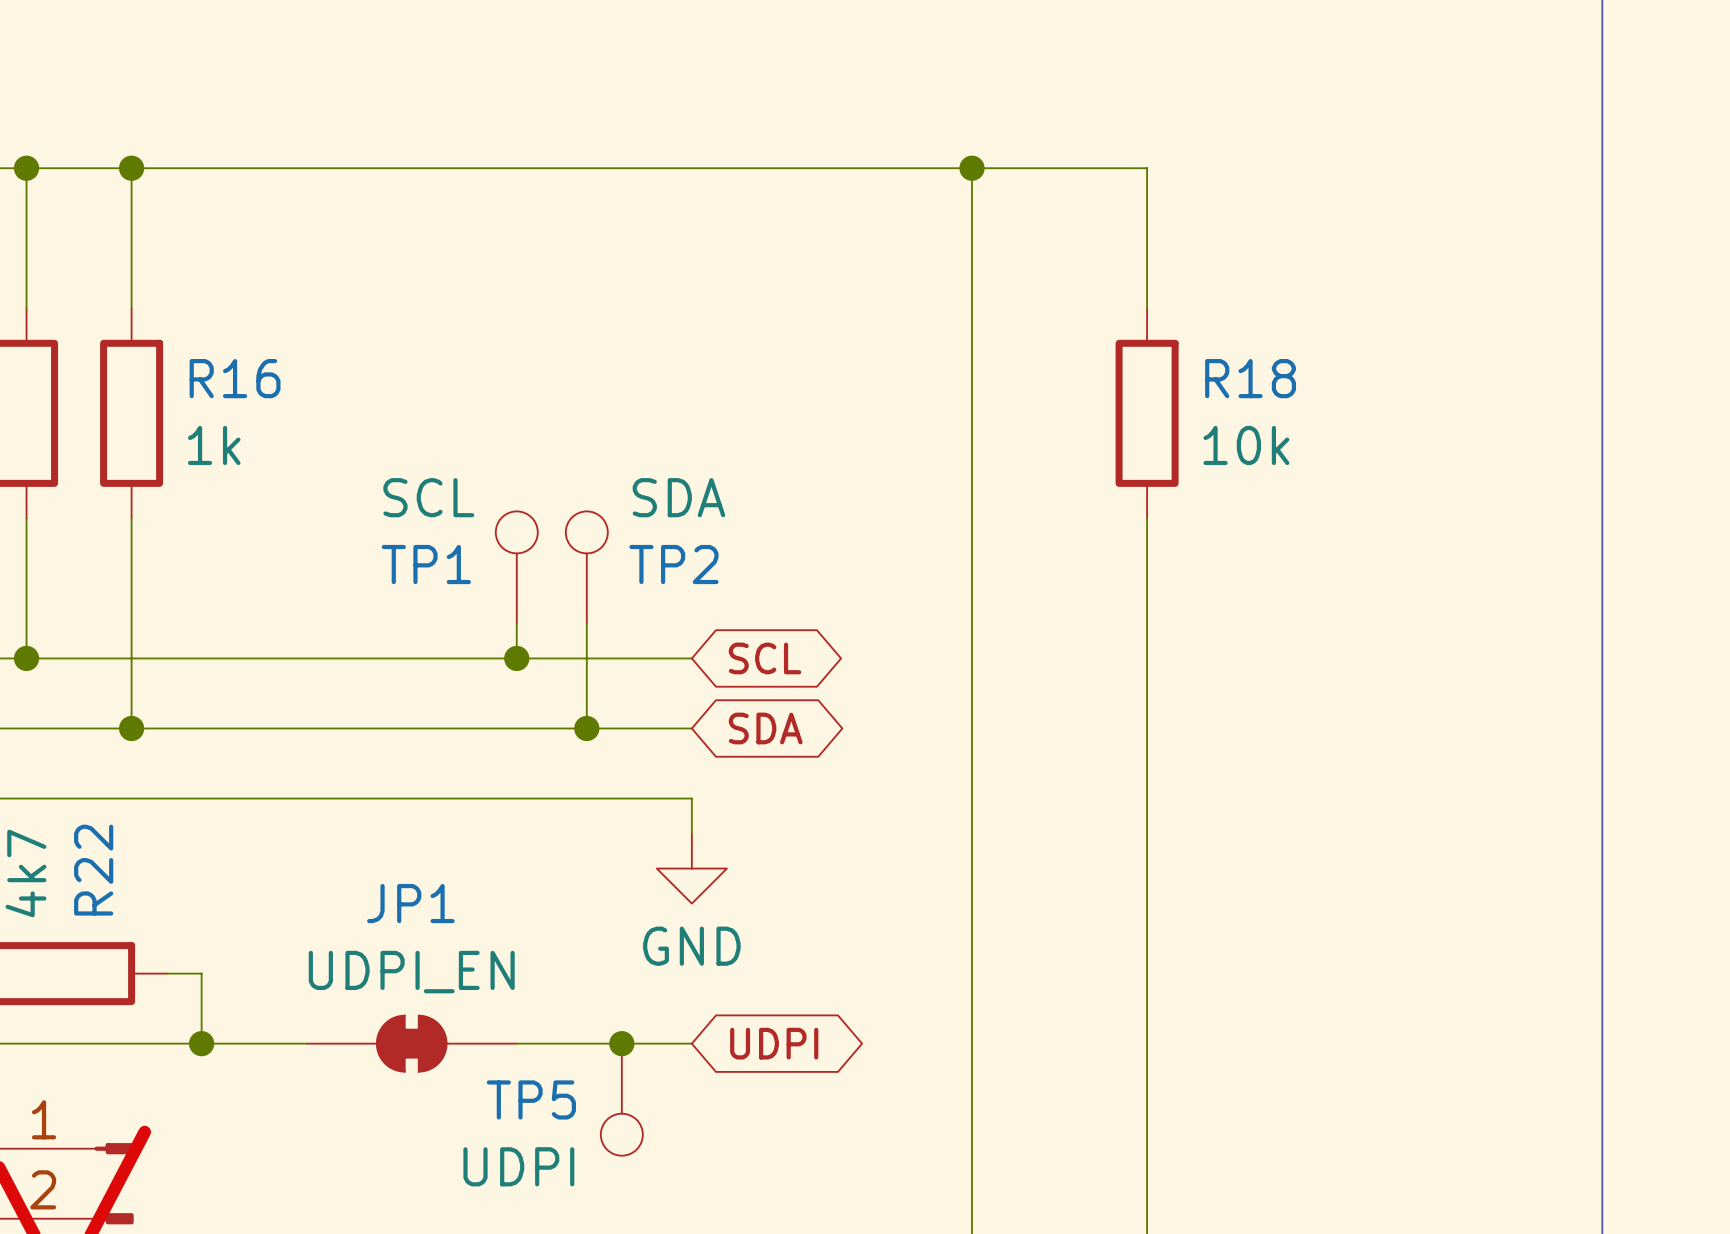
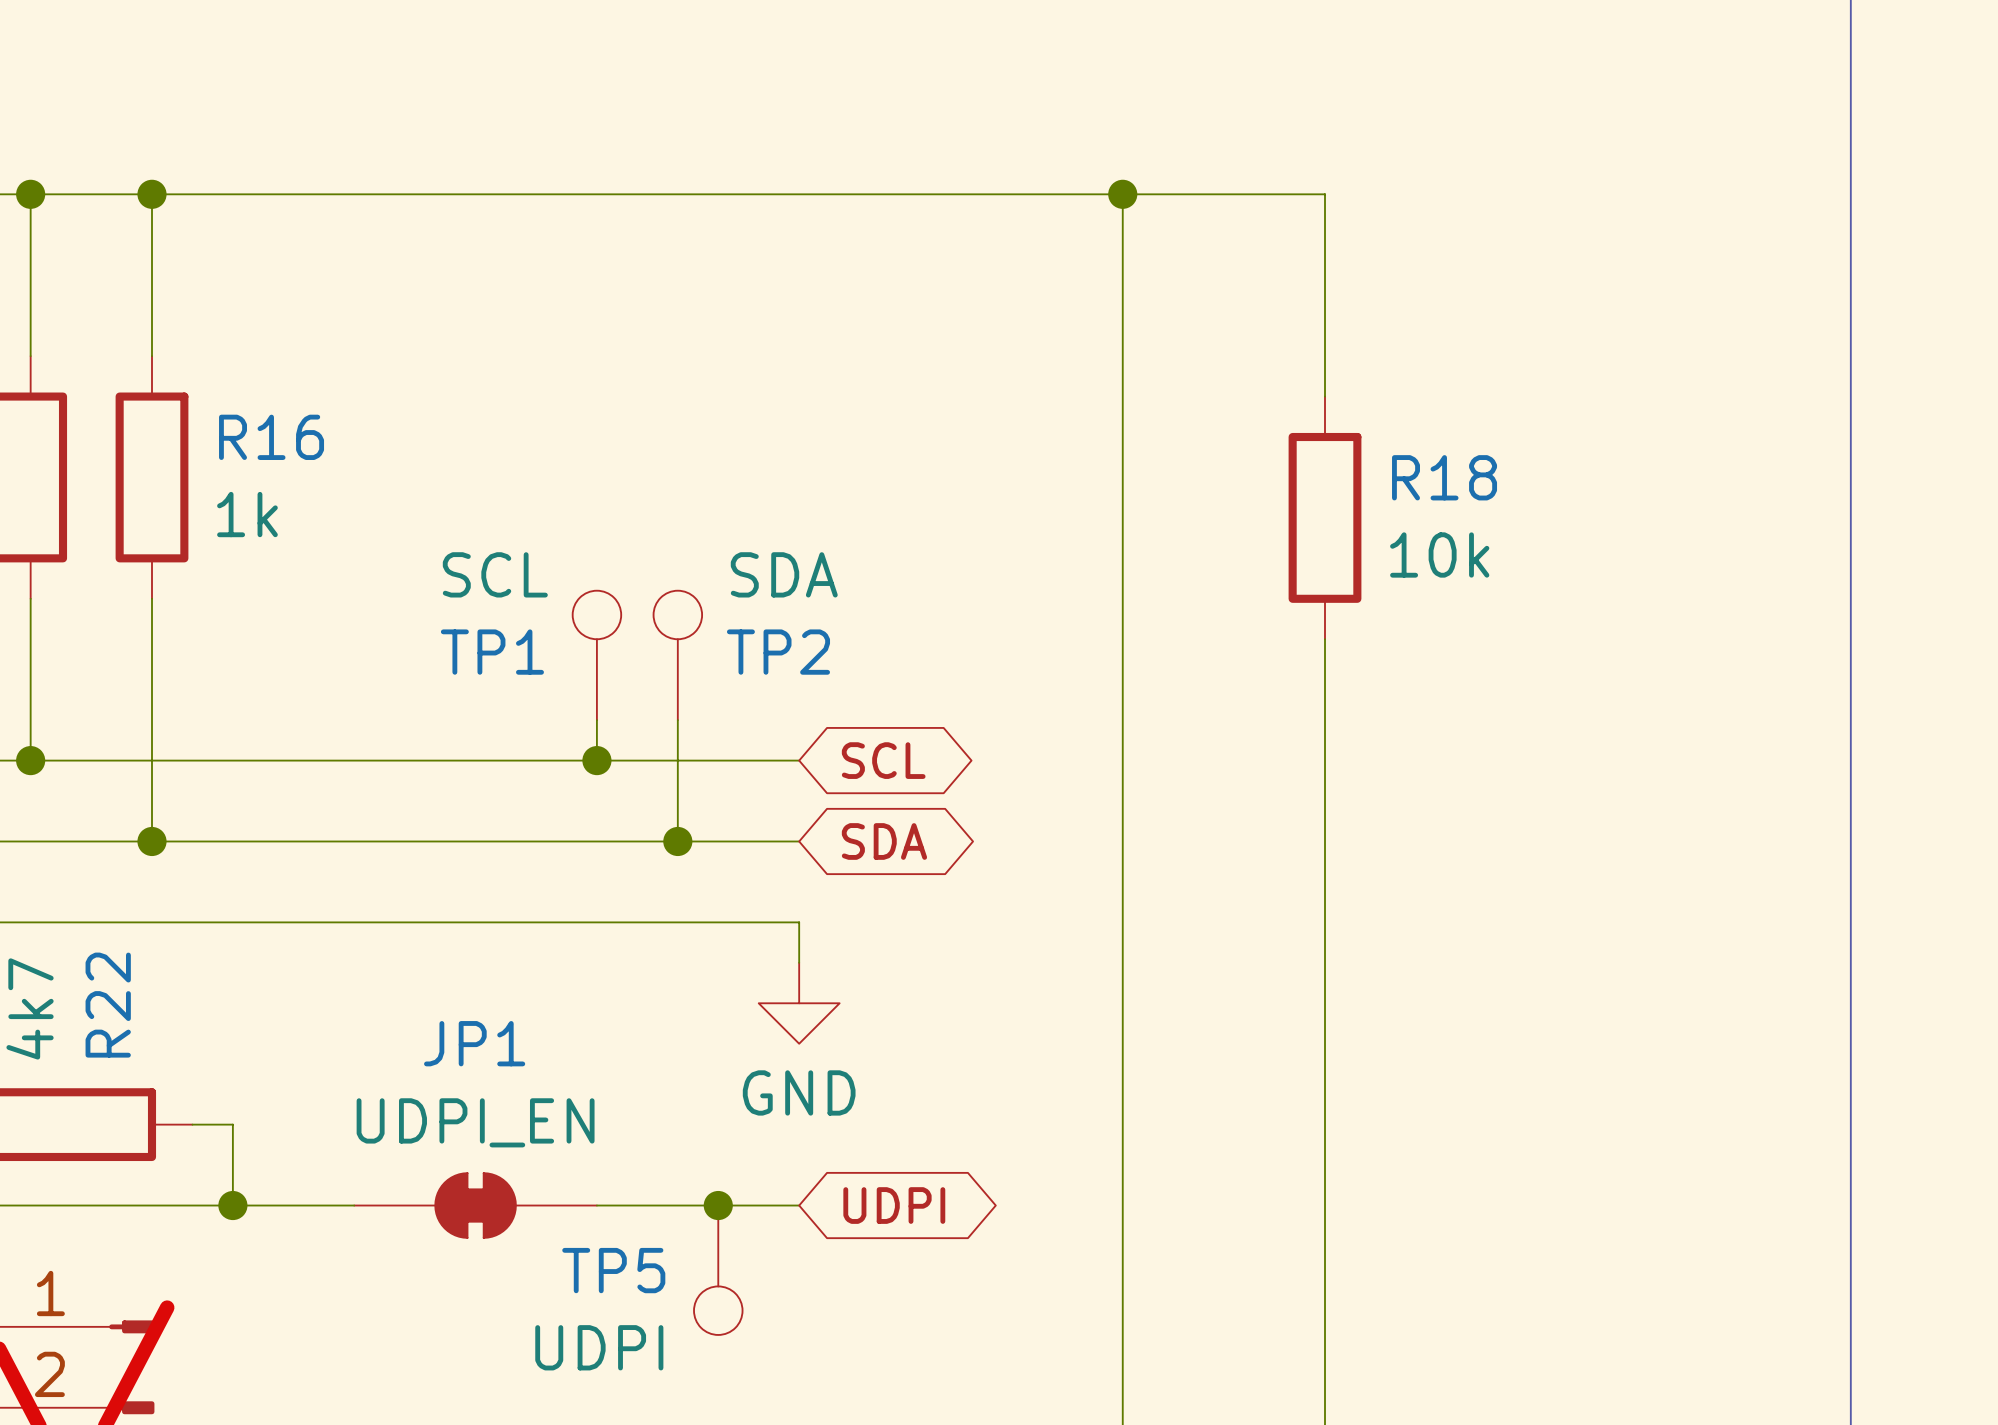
R18 position: (1147, 413) -> (1325, 517)

